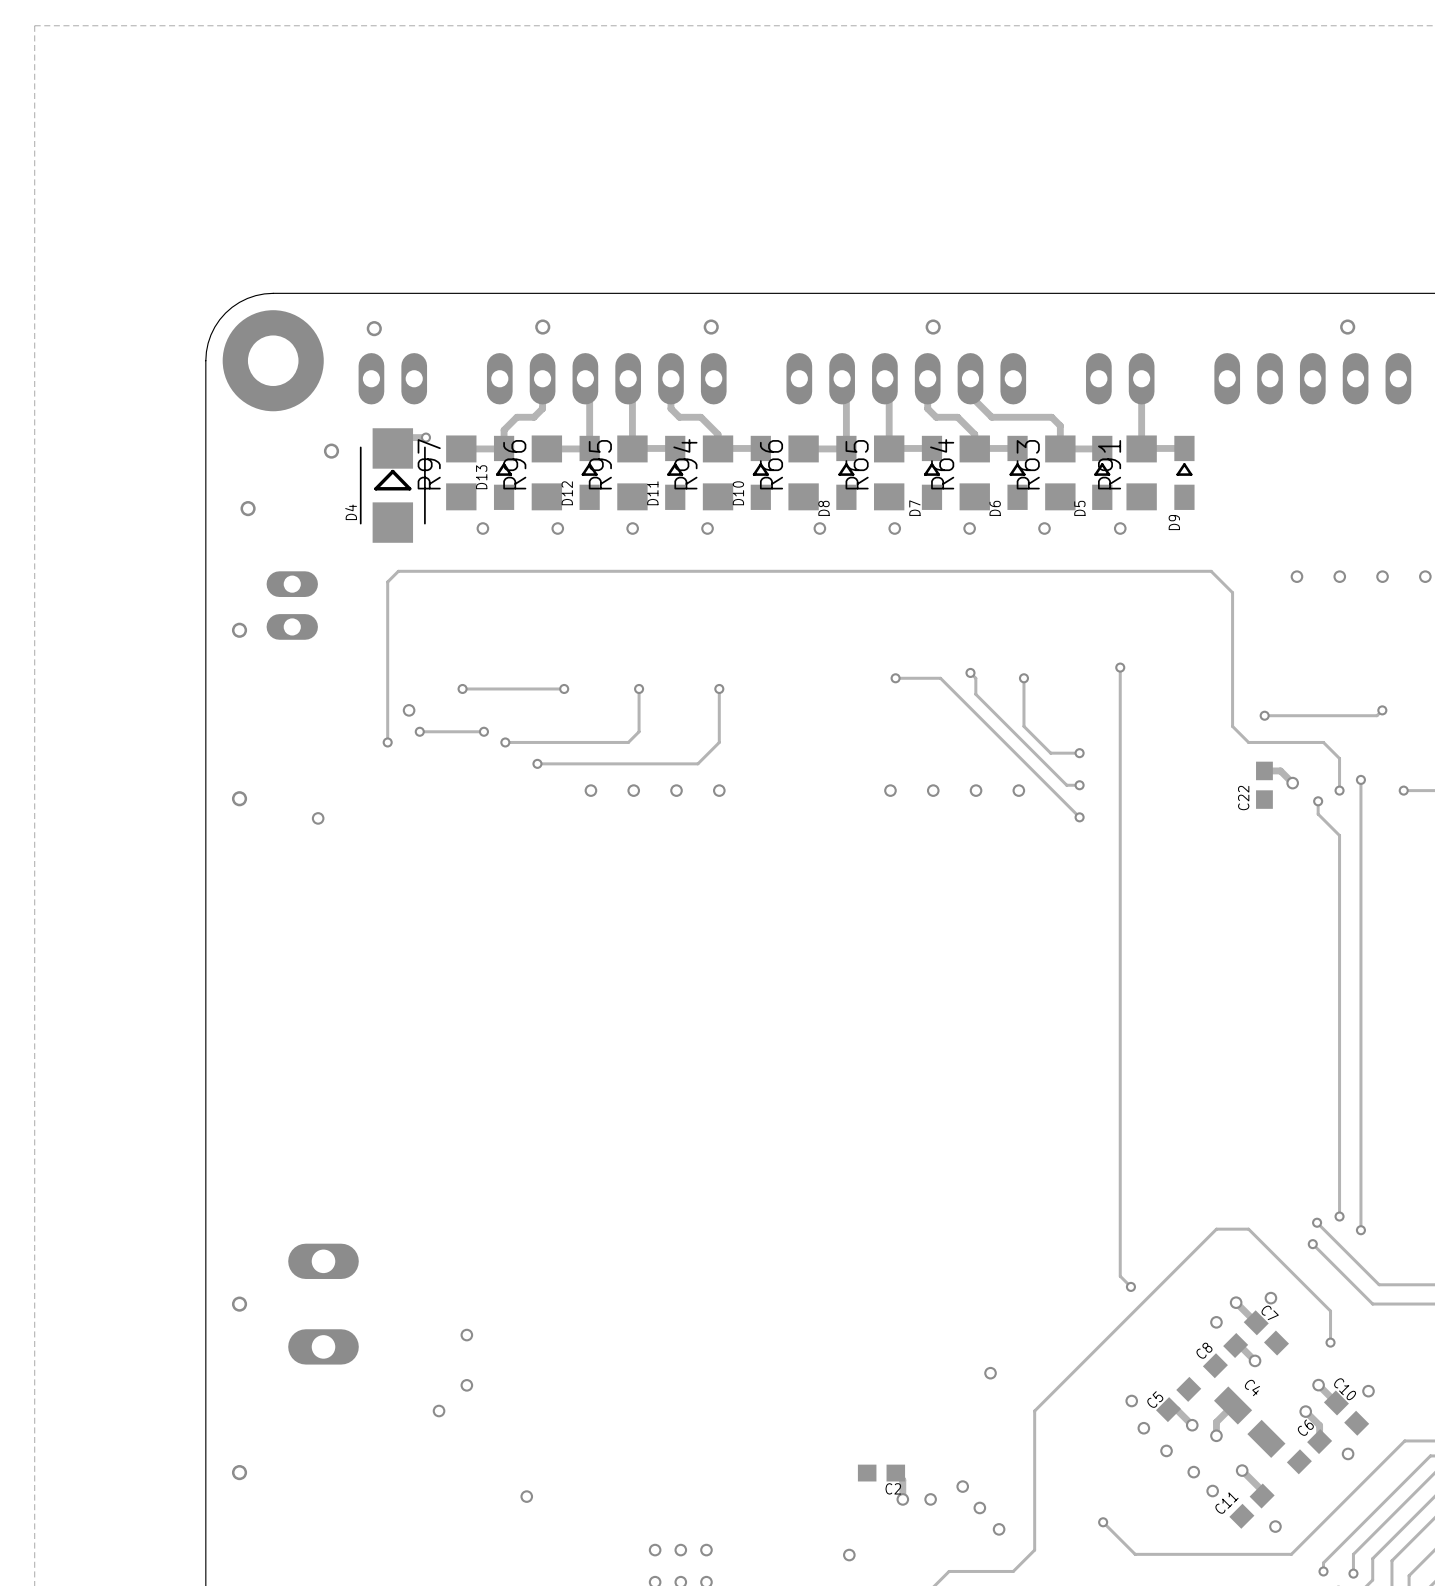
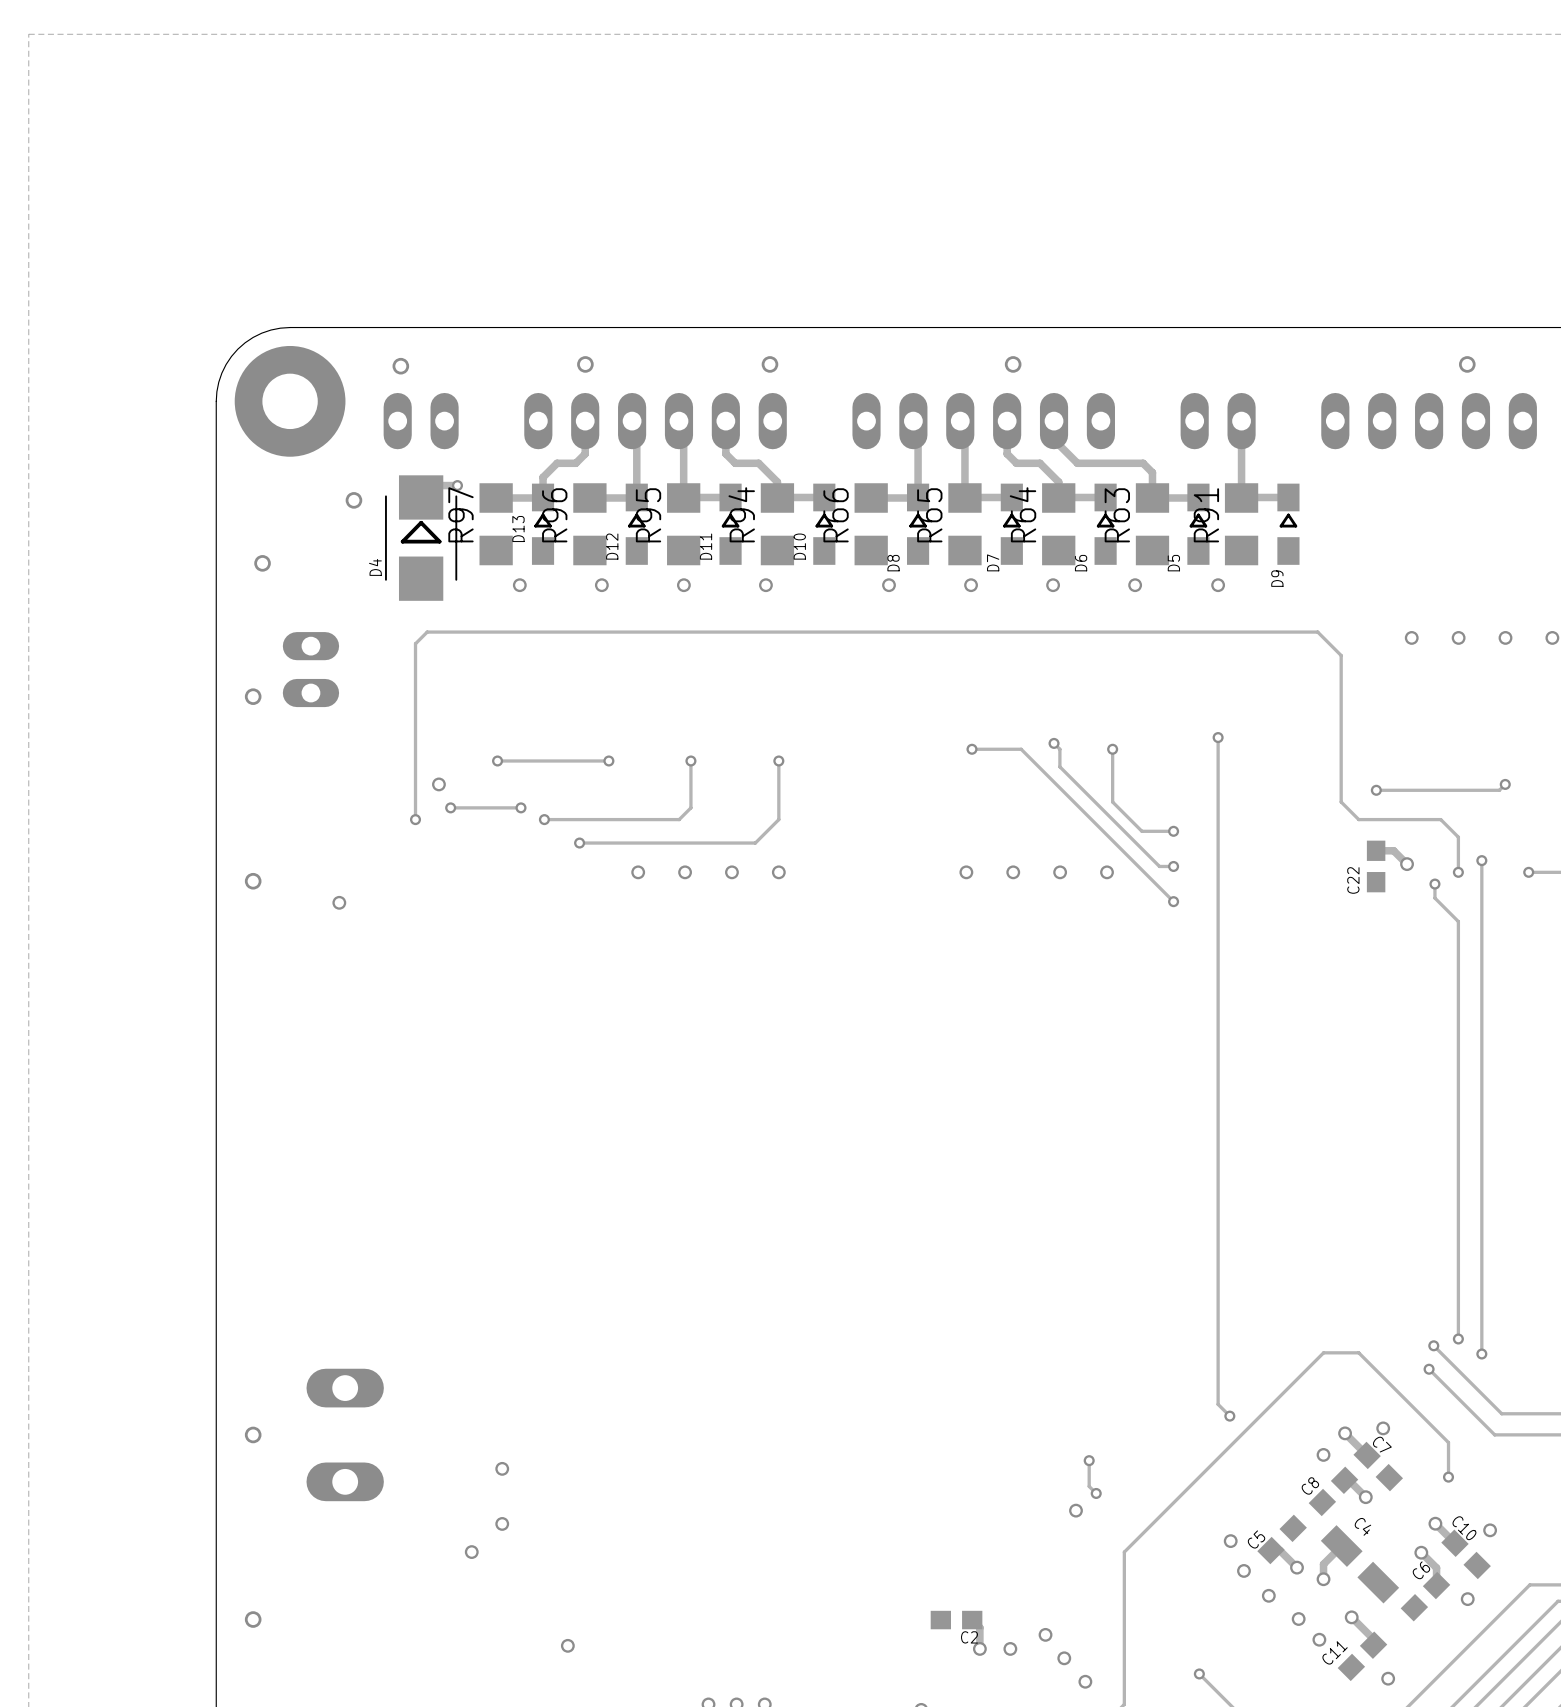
track: none -> (1089, 1460) (1089, 1486) (1096, 1493)
via: none -> (1089, 1460)
via: none -> (1096, 1493)

